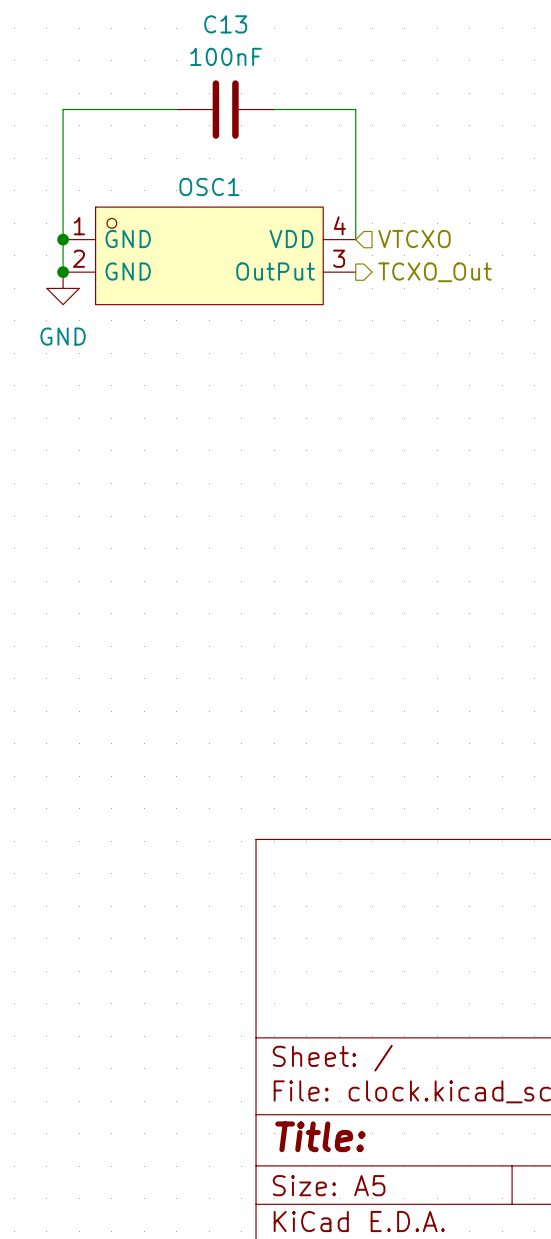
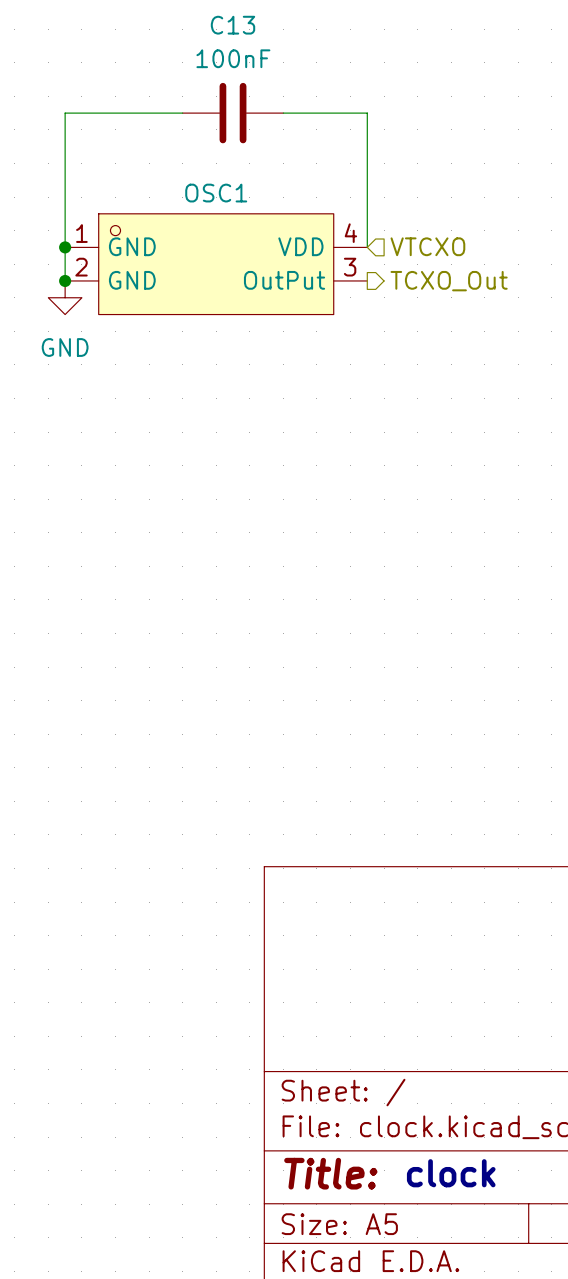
text: none -> clock (451, 1173)

